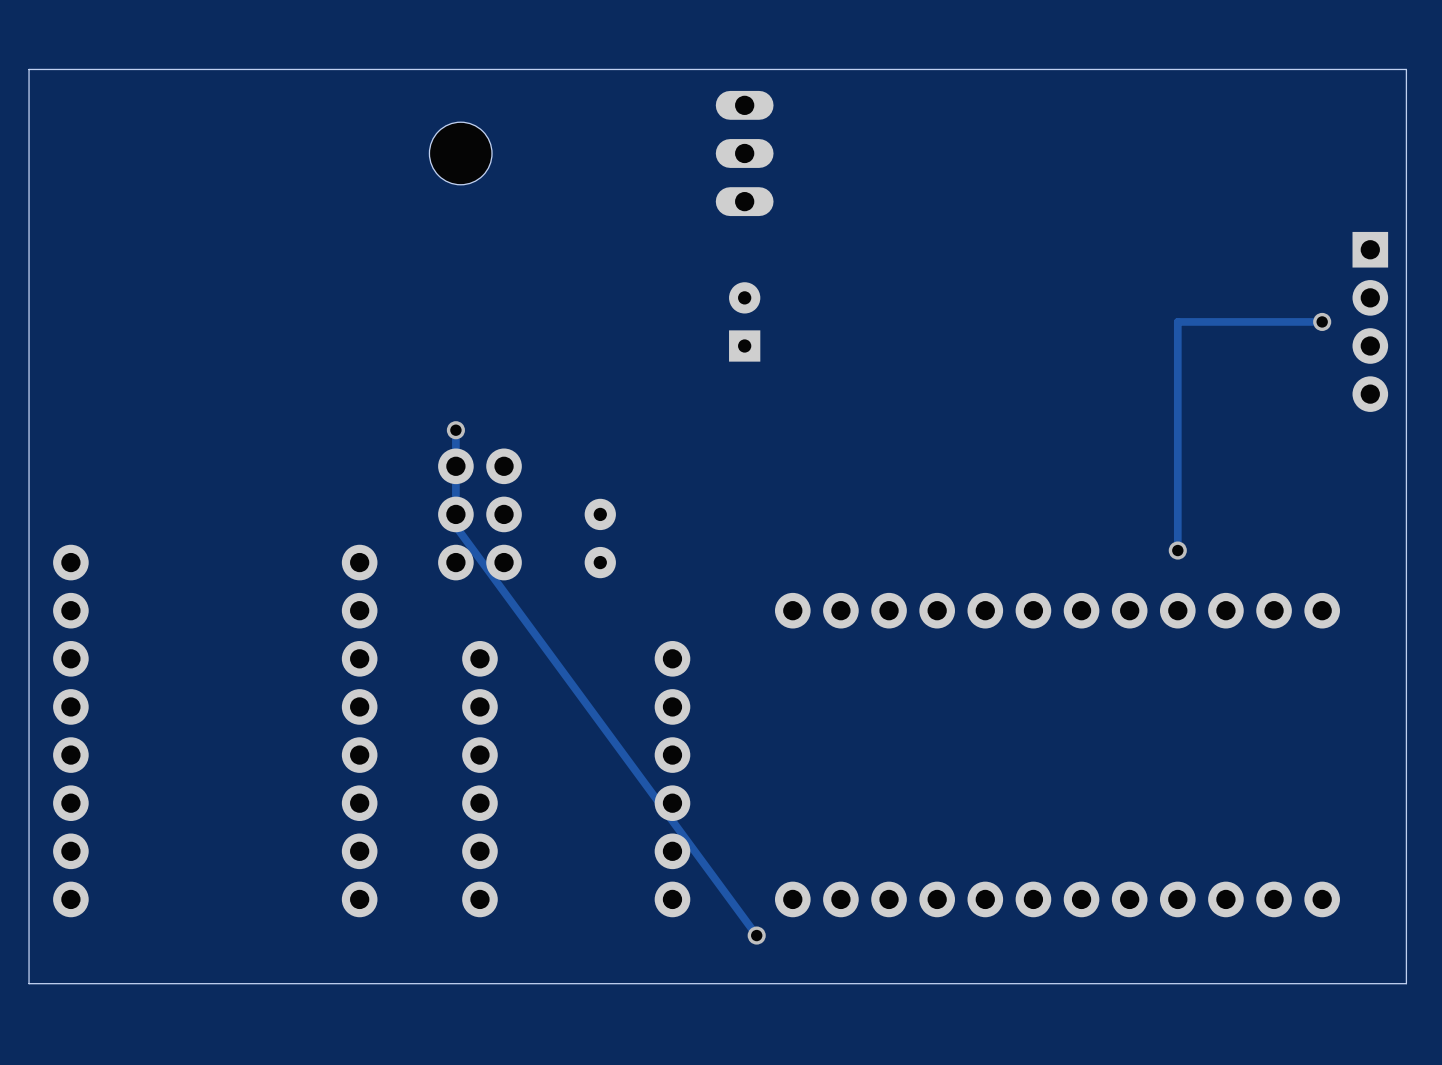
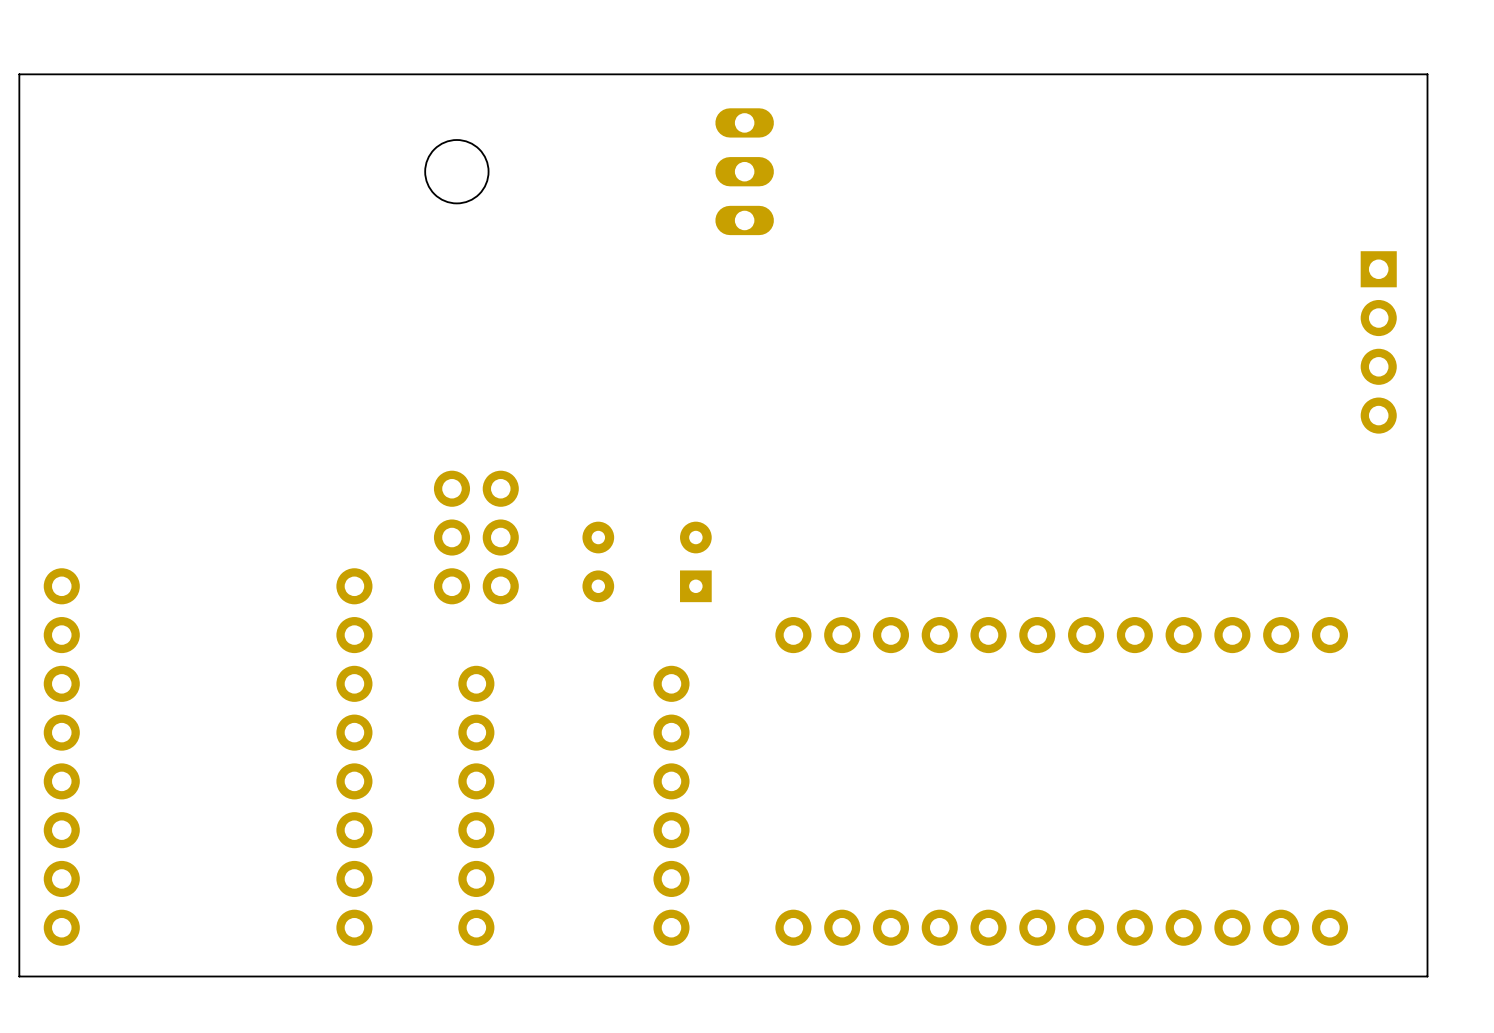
board edge: (29, 69) (1406, 69) (1406, 983) (29, 983) (29, 947) -> (19, 86) (19, 74) (1427, 74) (1427, 976) (19, 976)
part position: (744, 321) -> (695, 561)
track: (1322, 321) (1177, 321) (1177, 550) -> none
via: (1322, 321) -> none
track: (455, 430) (455, 526) (756, 935) -> none
via: (455, 430) -> none
via: (1177, 550) -> none
via: (756, 935) -> none

